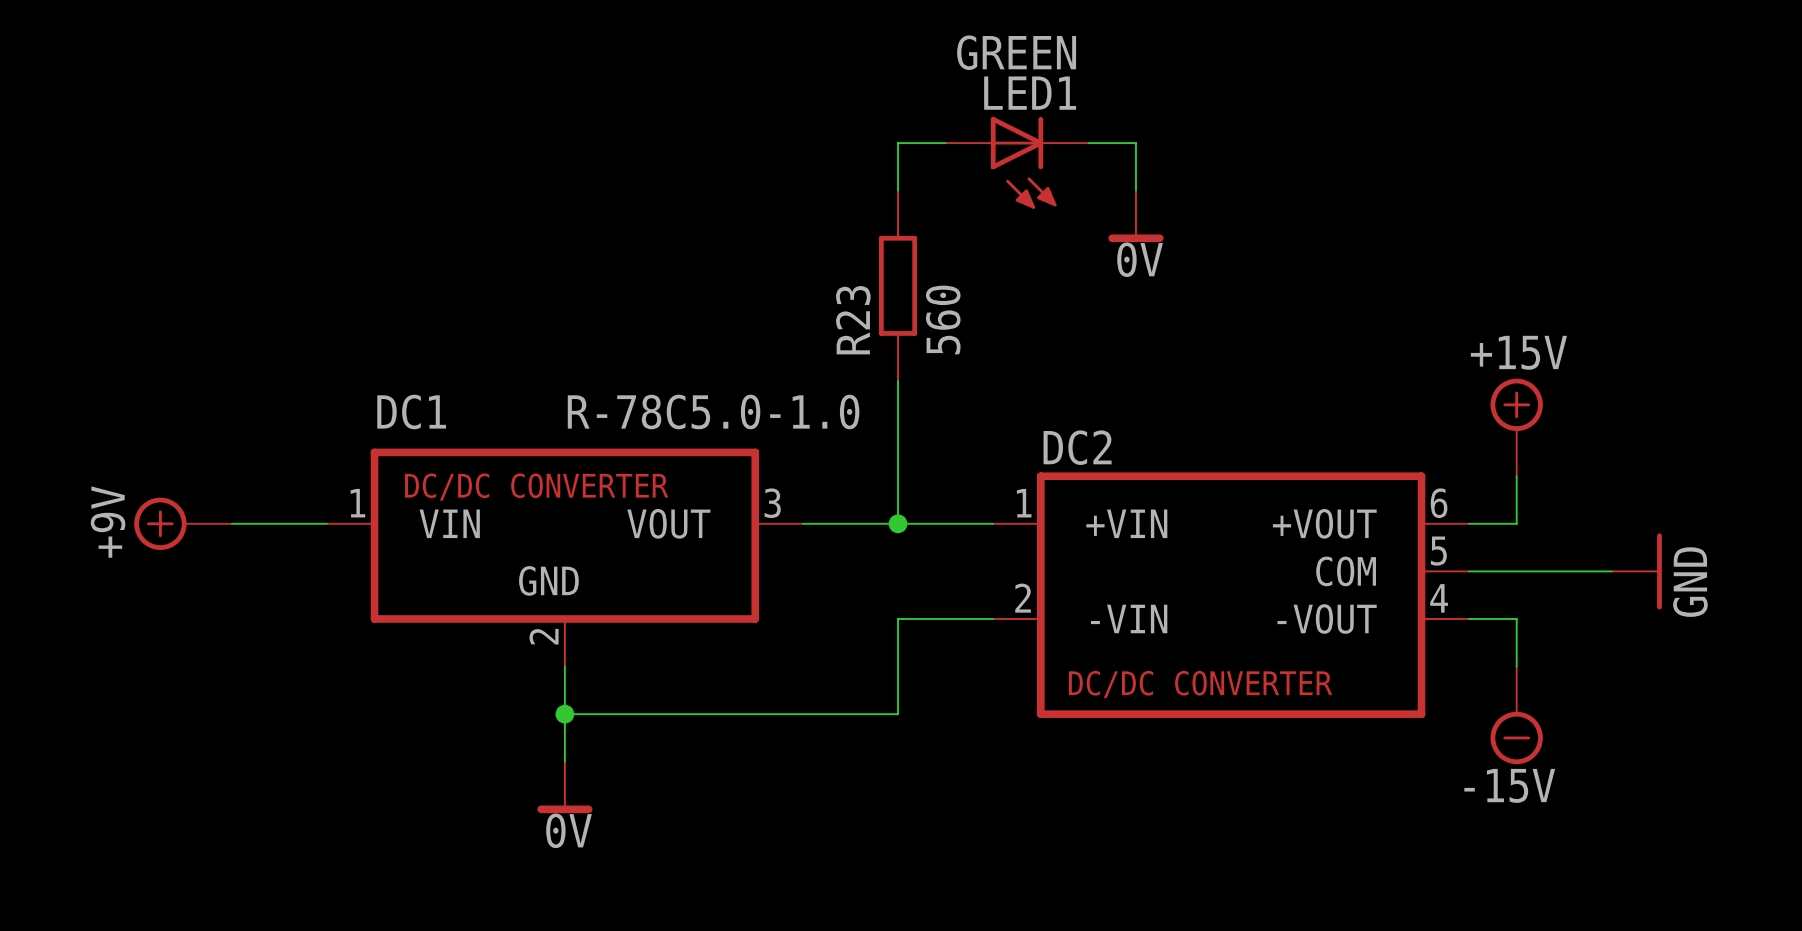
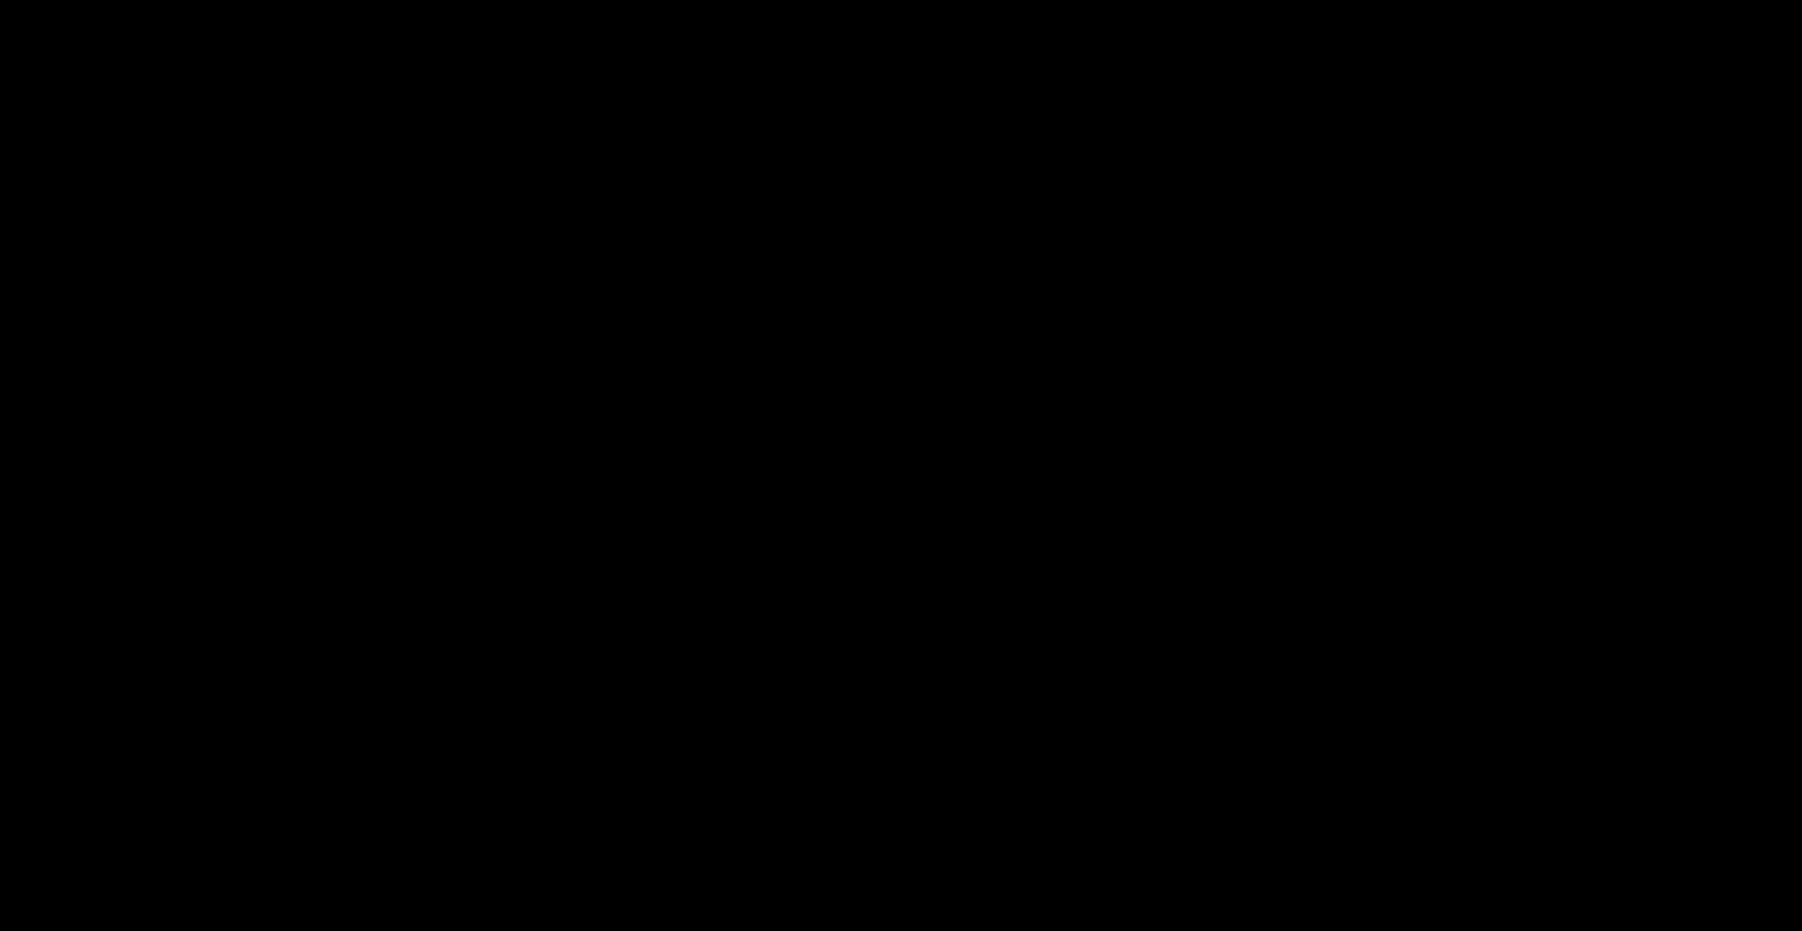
wire: (945, 143) (898, 143) (898, 190) -> none
wire: (1088, 143) (1135, 143) (1135, 190) -> none
LED1: GREEN (1017, 162) -> none
power symbol: 0V (1135, 216) -> none
R23: 560 (898, 285) -> none
wire: (898, 381) (898, 523) -> none
power symbol: +15V (1516, 427) -> none
wire: (1516, 476) (1516, 523) (1469, 523) -> none
power symbol: +9V (182, 523) -> none
wire: (231, 523) (326, 523) -> none
wire: (802, 523) (993, 523) -> none
junction: (898, 523) -> none
DC1: R-78C5.0-1.0 (564, 557) -> none
wire: (1469, 571) (1611, 571) -> none
power symbol: GND (1636, 571) -> none
DC2: (1231, 595) -> none
wire: (993, 618) (898, 618) (898, 714) (564, 714) -> none
wire: (1469, 618) (1516, 618) (1516, 666) -> none
wire: (564, 666) (564, 761) -> none
junction: (564, 714) -> none
power symbol: -15V (1516, 715) -> none
power symbol: 0V (564, 787) -> none

